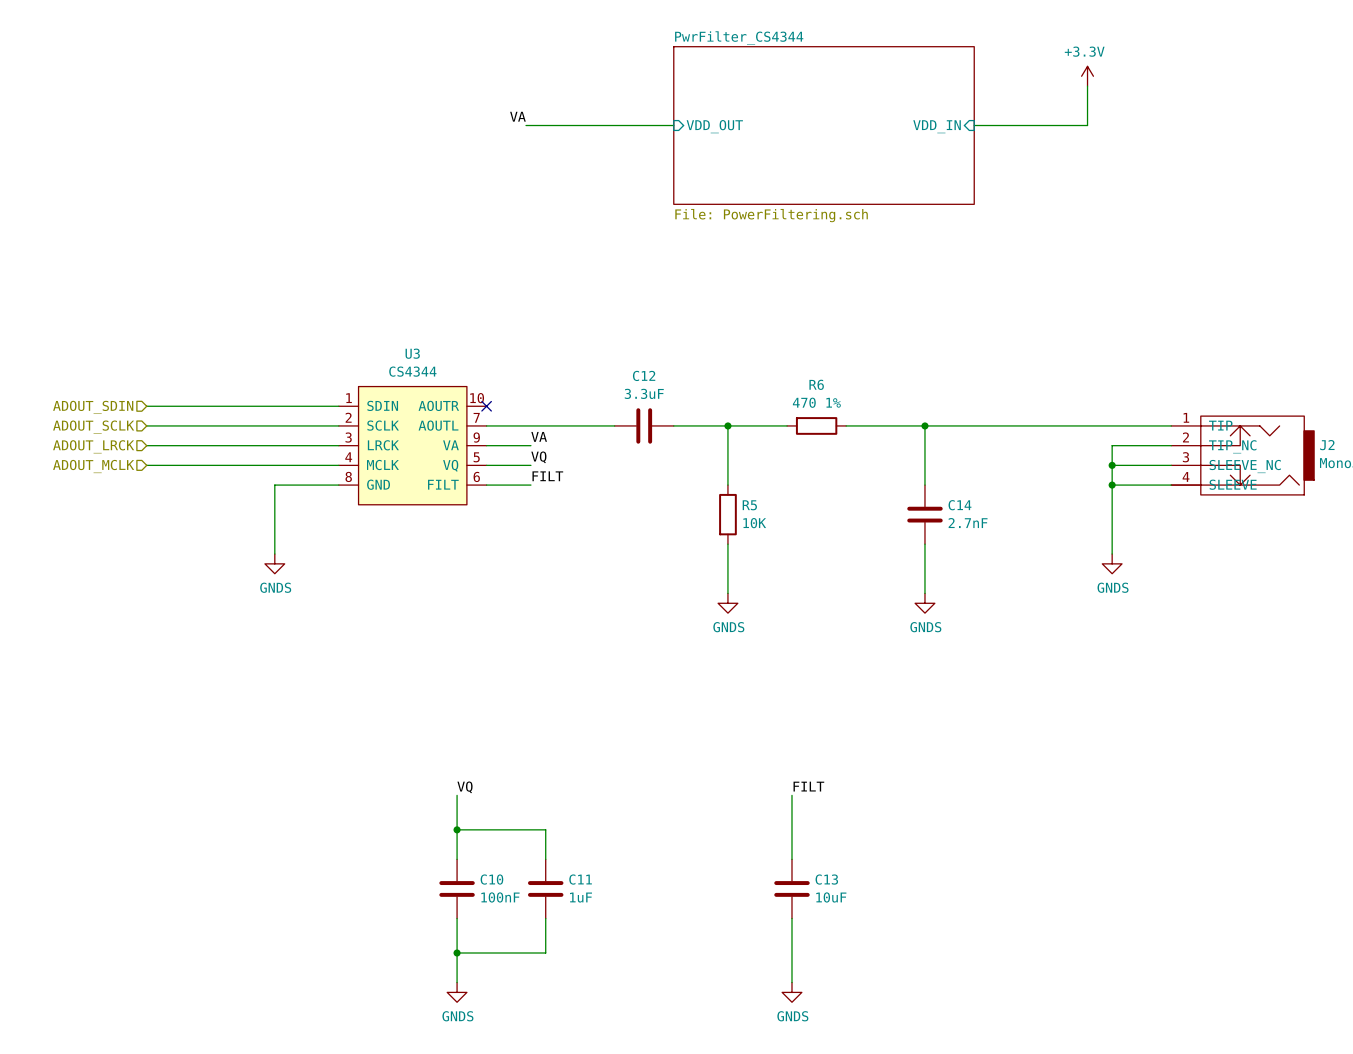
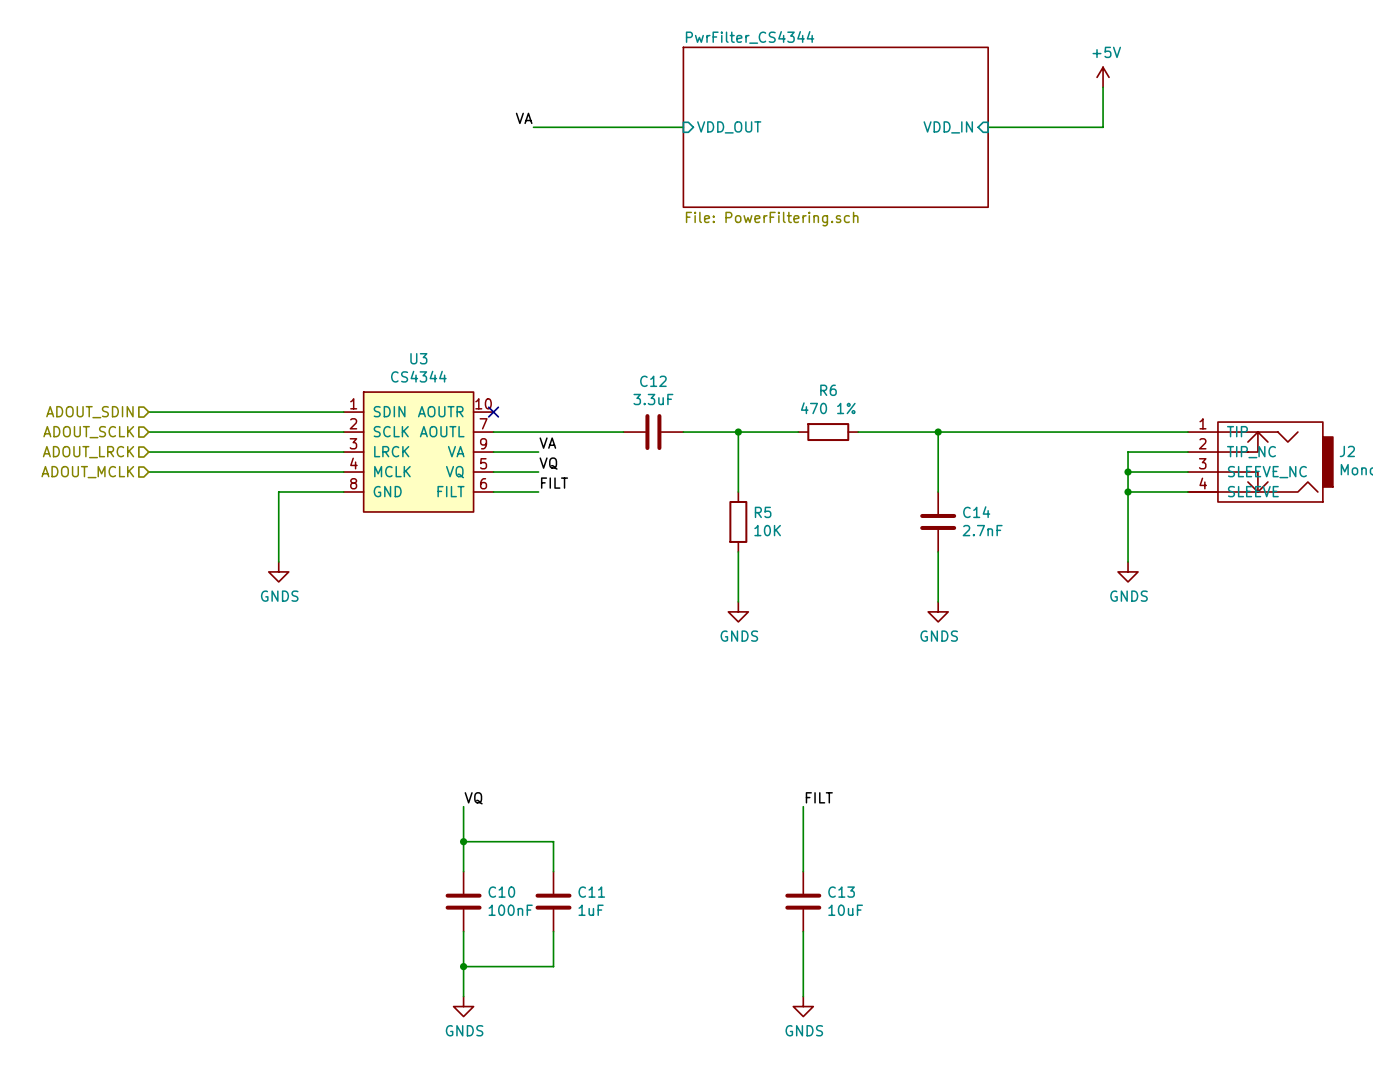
power symbol: +3.3V (1087, 76) -> +5V (1103, 77)

